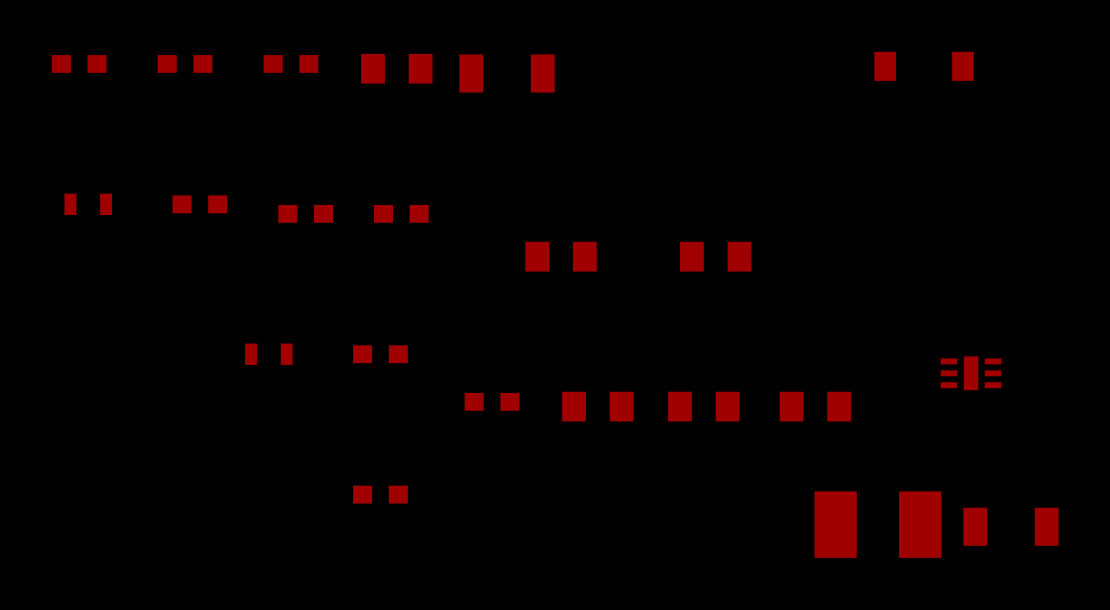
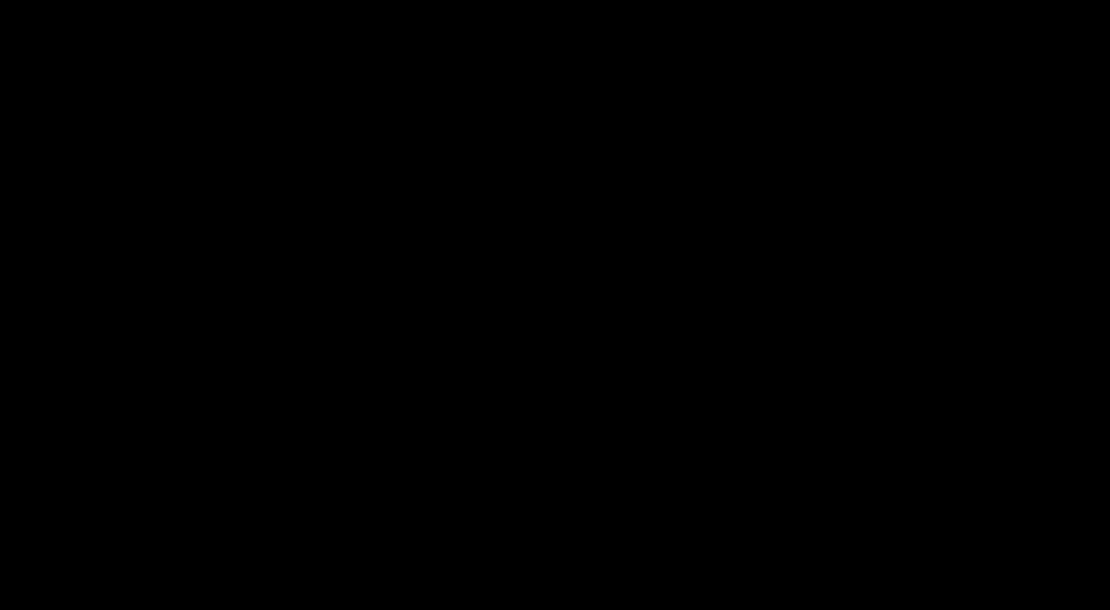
part: (79, 63) -> none
part: (185, 63) -> none
part: (290, 63) -> none
part: (924, 66) -> none
part: (396, 68) -> none
part: (507, 73) -> none
part: (88, 204) -> none
part: (199, 204) -> none
part: (305, 213) -> none
part: (401, 213) -> none
part: (561, 256) -> none
part: (715, 256) -> none
part: (268, 354) -> none
part: (380, 354) -> none
part: (971, 373) -> none
part: (492, 401) -> none
part: (597, 406) -> none
part: (703, 406) -> none
part: (815, 406) -> none
part: (380, 494) -> none
part: (877, 524) -> none
part: (1010, 526) -> none

